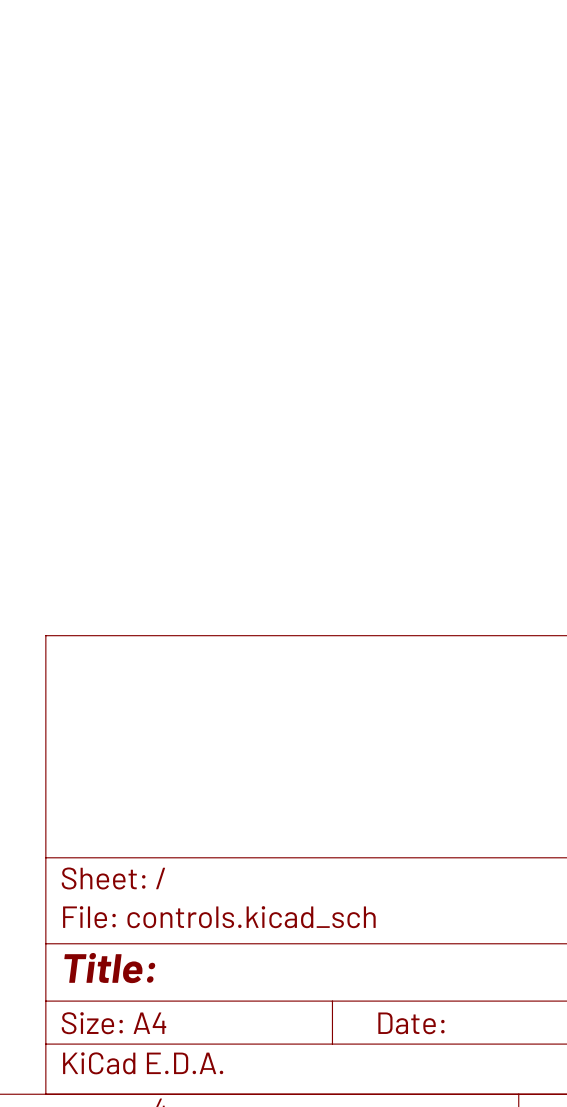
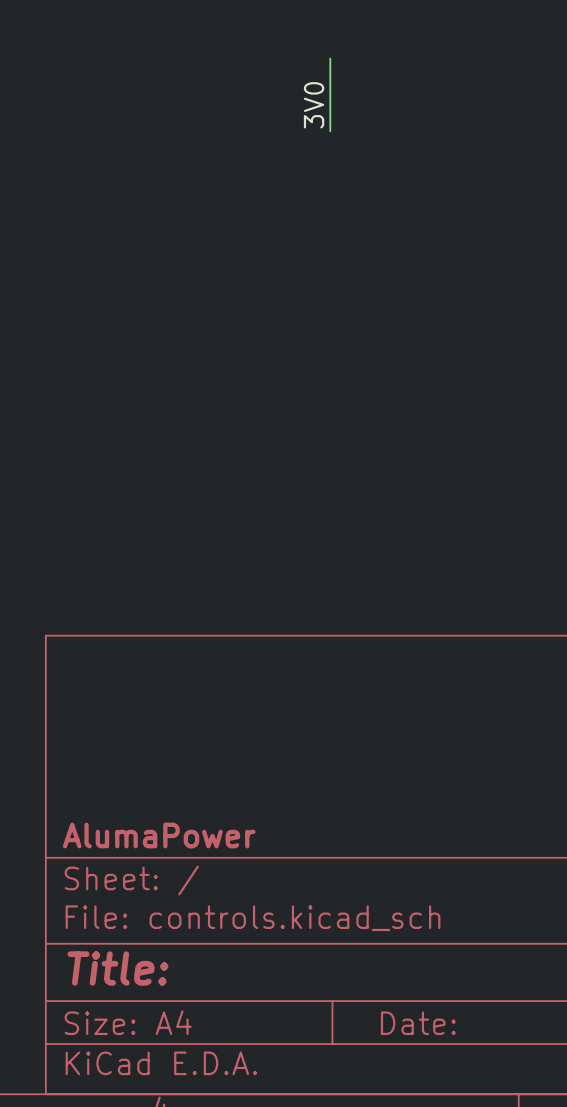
wire: none -> (330, 58) (330, 131)
label: none -> 3V0 (314, 105)
title block: none -> AlumaPower (159, 835)

